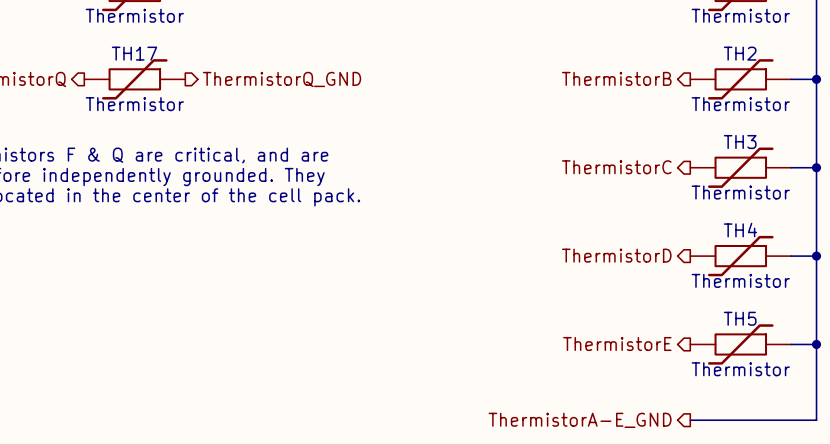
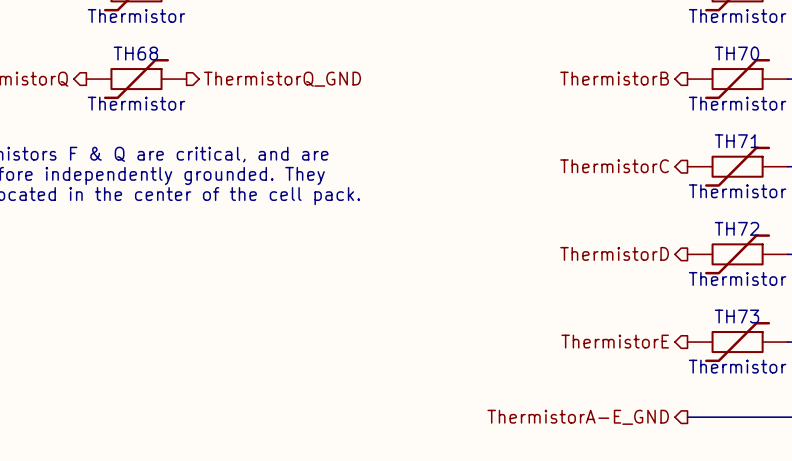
TH17 name: TH17 (134, 53) -> TH68 (135, 53)
TH2 name: TH2 (740, 53) -> TH70 (736, 53)
TH3 name: TH3 (740, 142) -> TH71 (736, 141)
TH4 name: TH4 (740, 230) -> TH72 (736, 228)
TH5 name: TH5 (740, 318) -> TH73 (736, 316)

